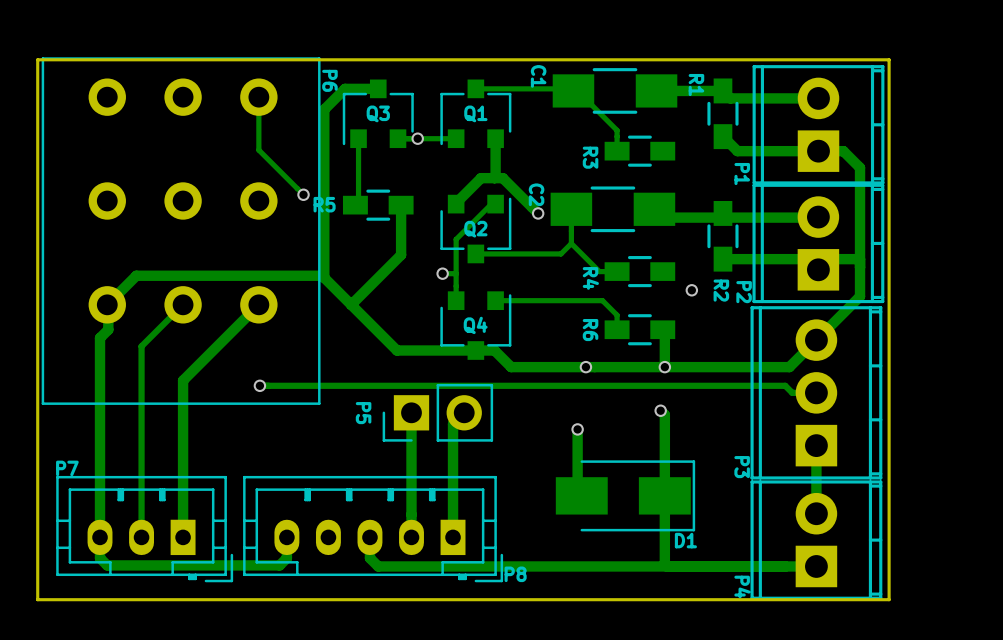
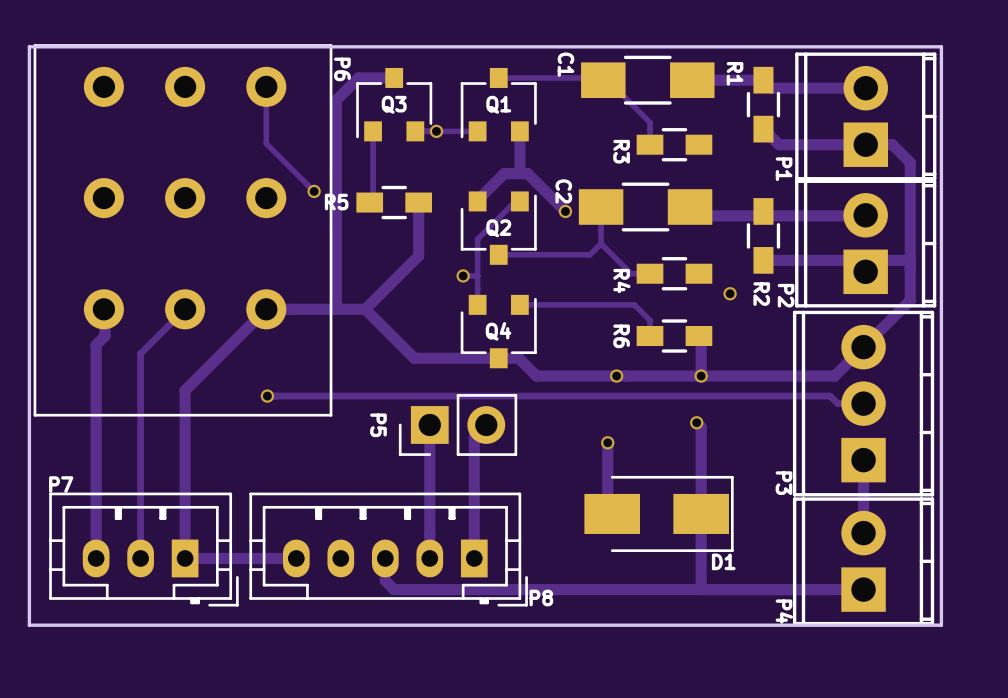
track: none -> (336, 280) (336, 304) (331, 309)
track: (351, 304) (322, 275) (136, 275) (107, 304) -> (365, 309) (266, 309)
track: (286, 537) (286, 558) (279, 565) (107, 565) (100, 558) (100, 537) -> (296, 558) (185, 558)

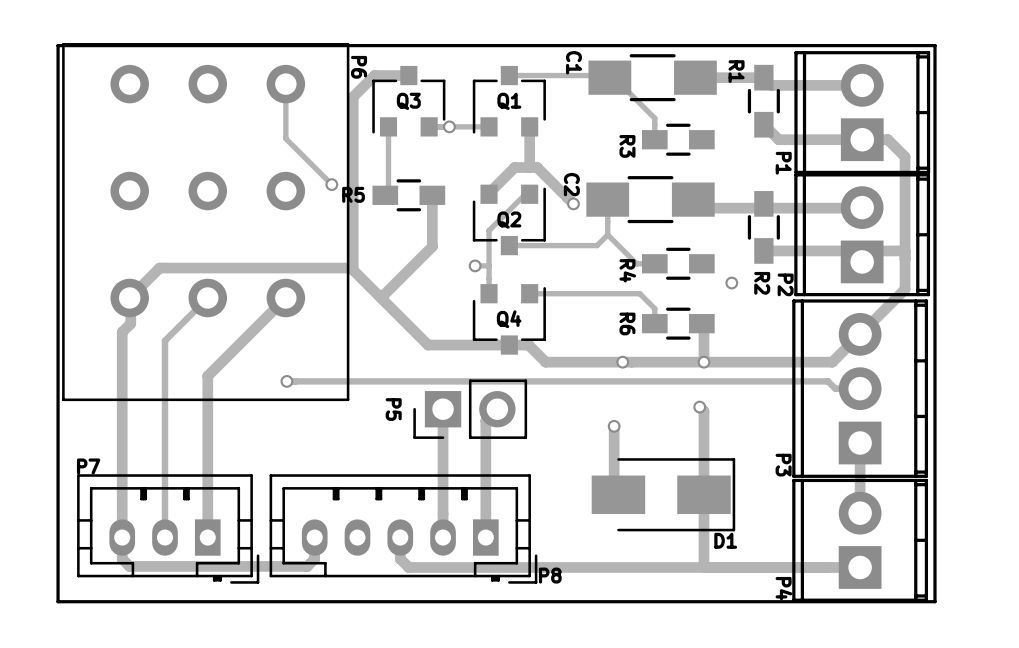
track: (336, 280) (336, 304) (331, 309) -> none
track: (365, 309) (266, 309) -> (381, 297) (351, 268) (159, 268) (129, 297)
track: (296, 558) (185, 558) -> (314, 537) (314, 558) (307, 566) (129, 566) (122, 558) (122, 537)

